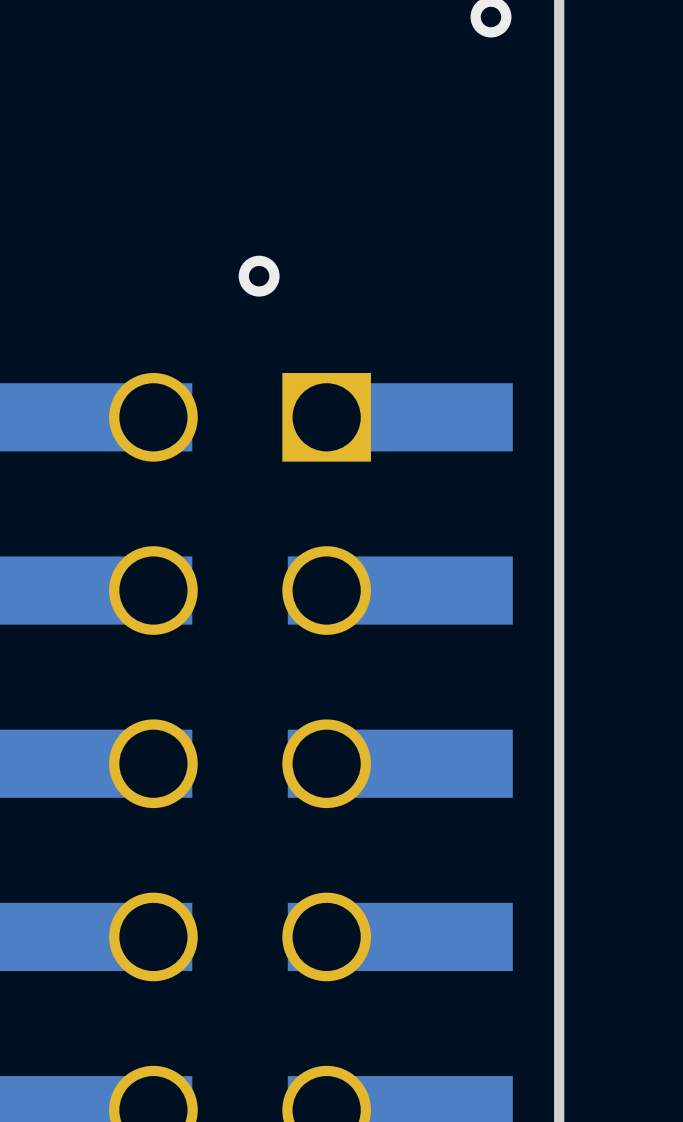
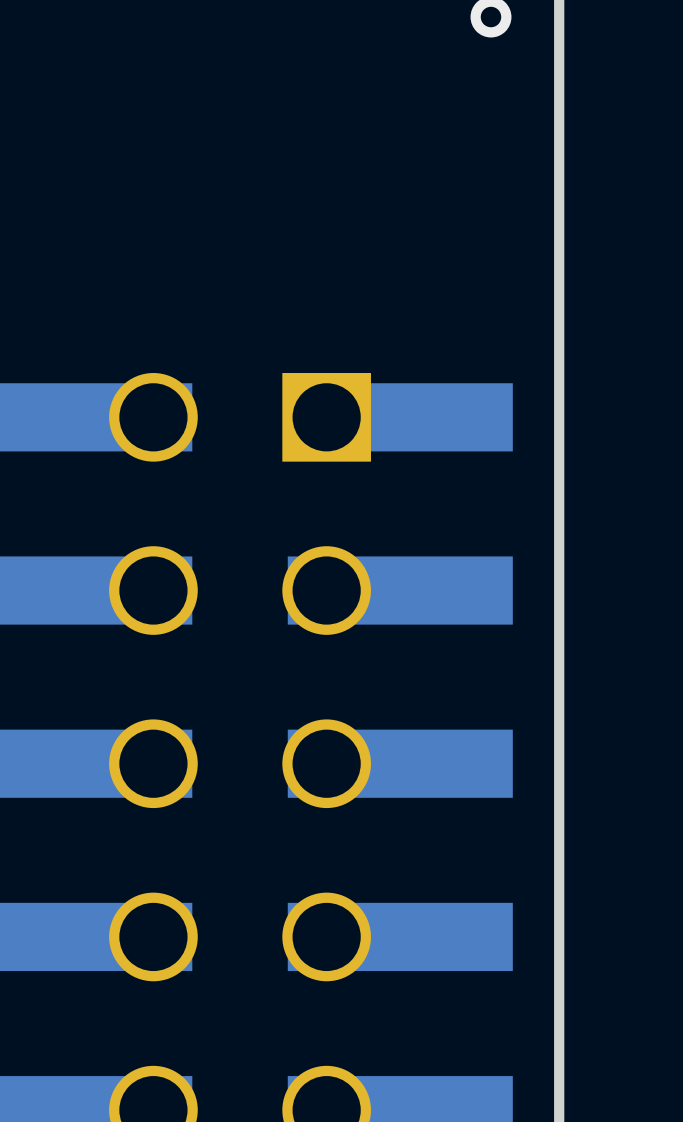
via: (259, 276) -> none

